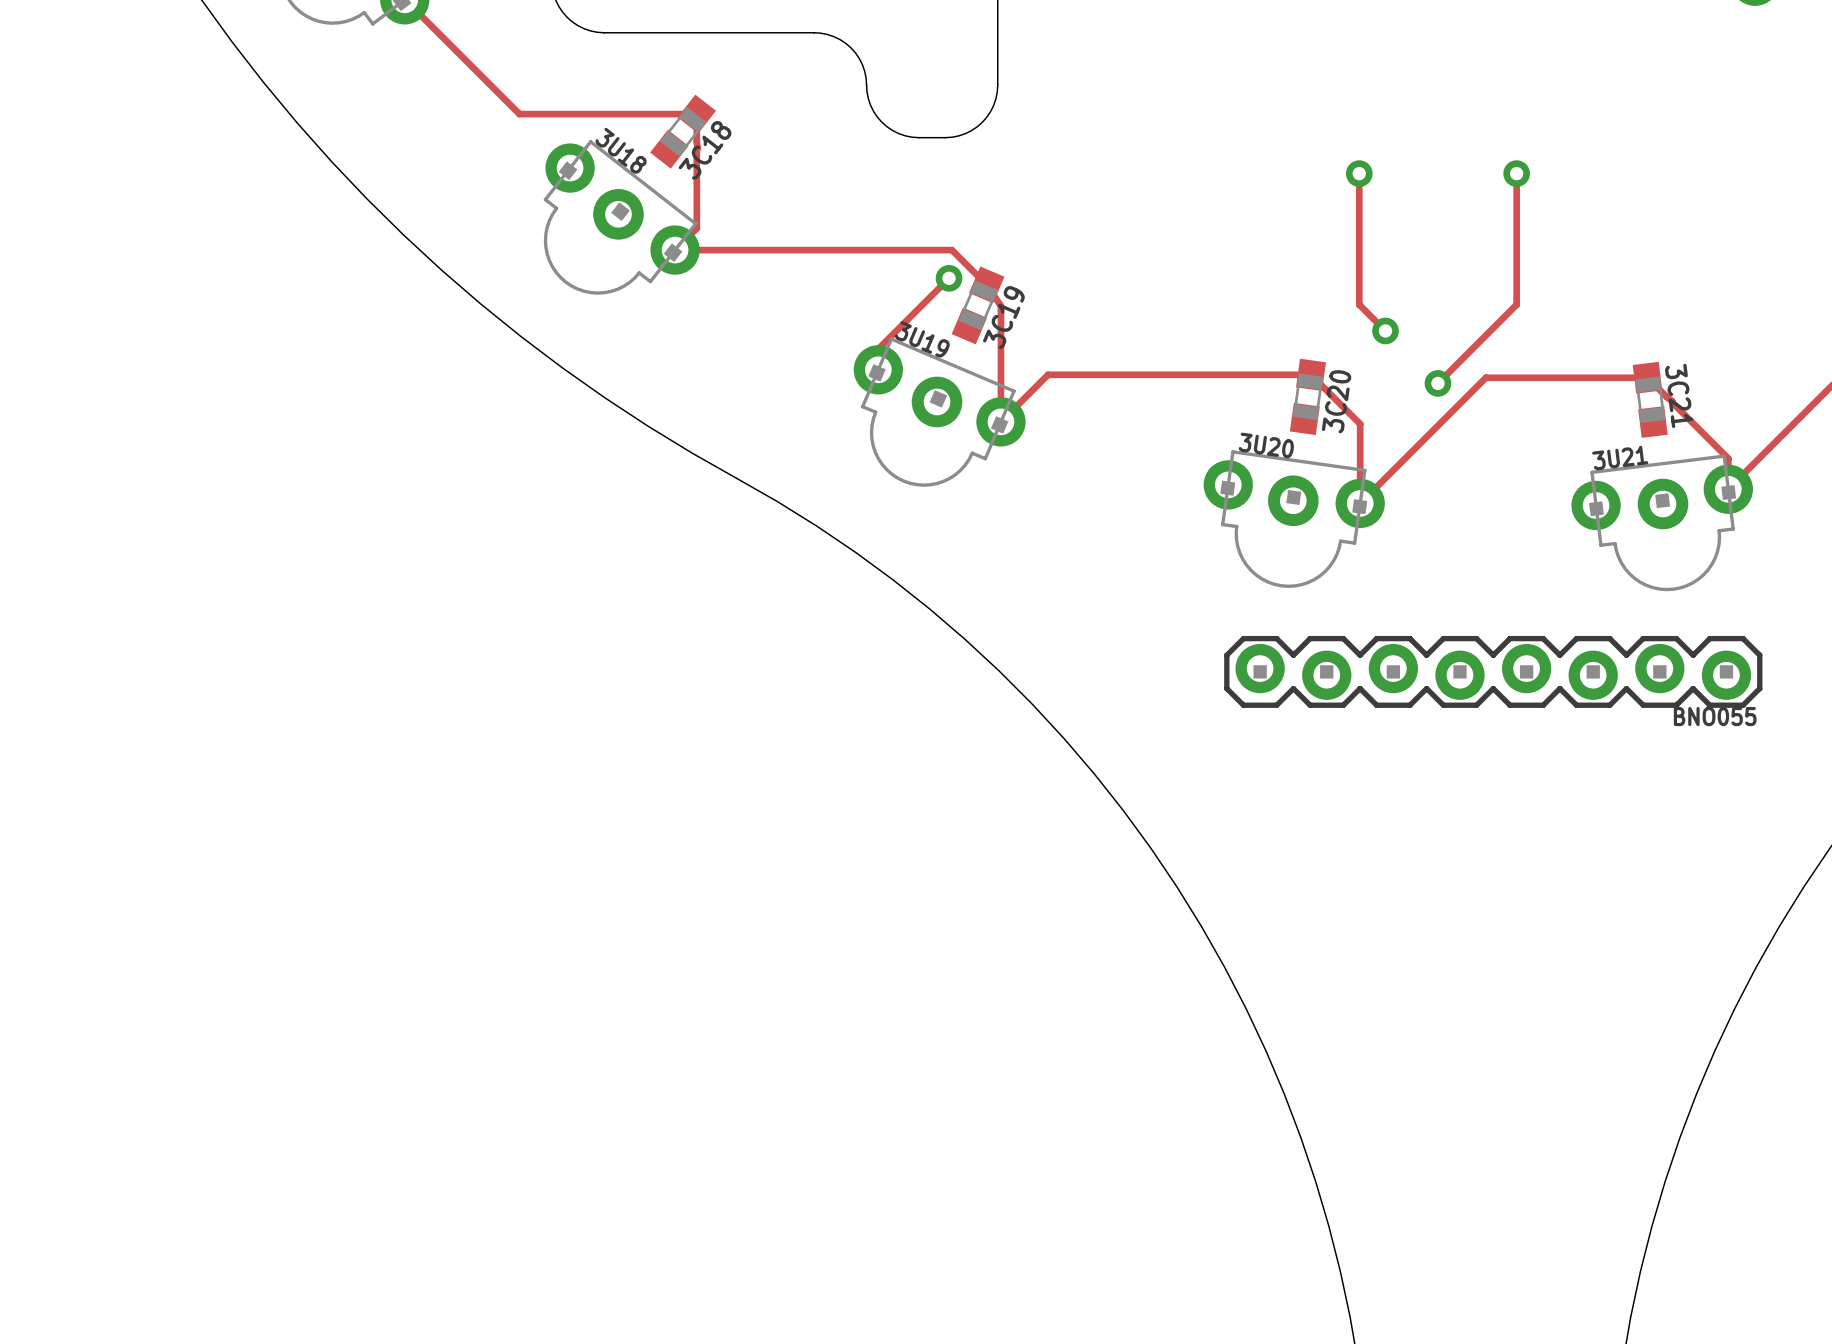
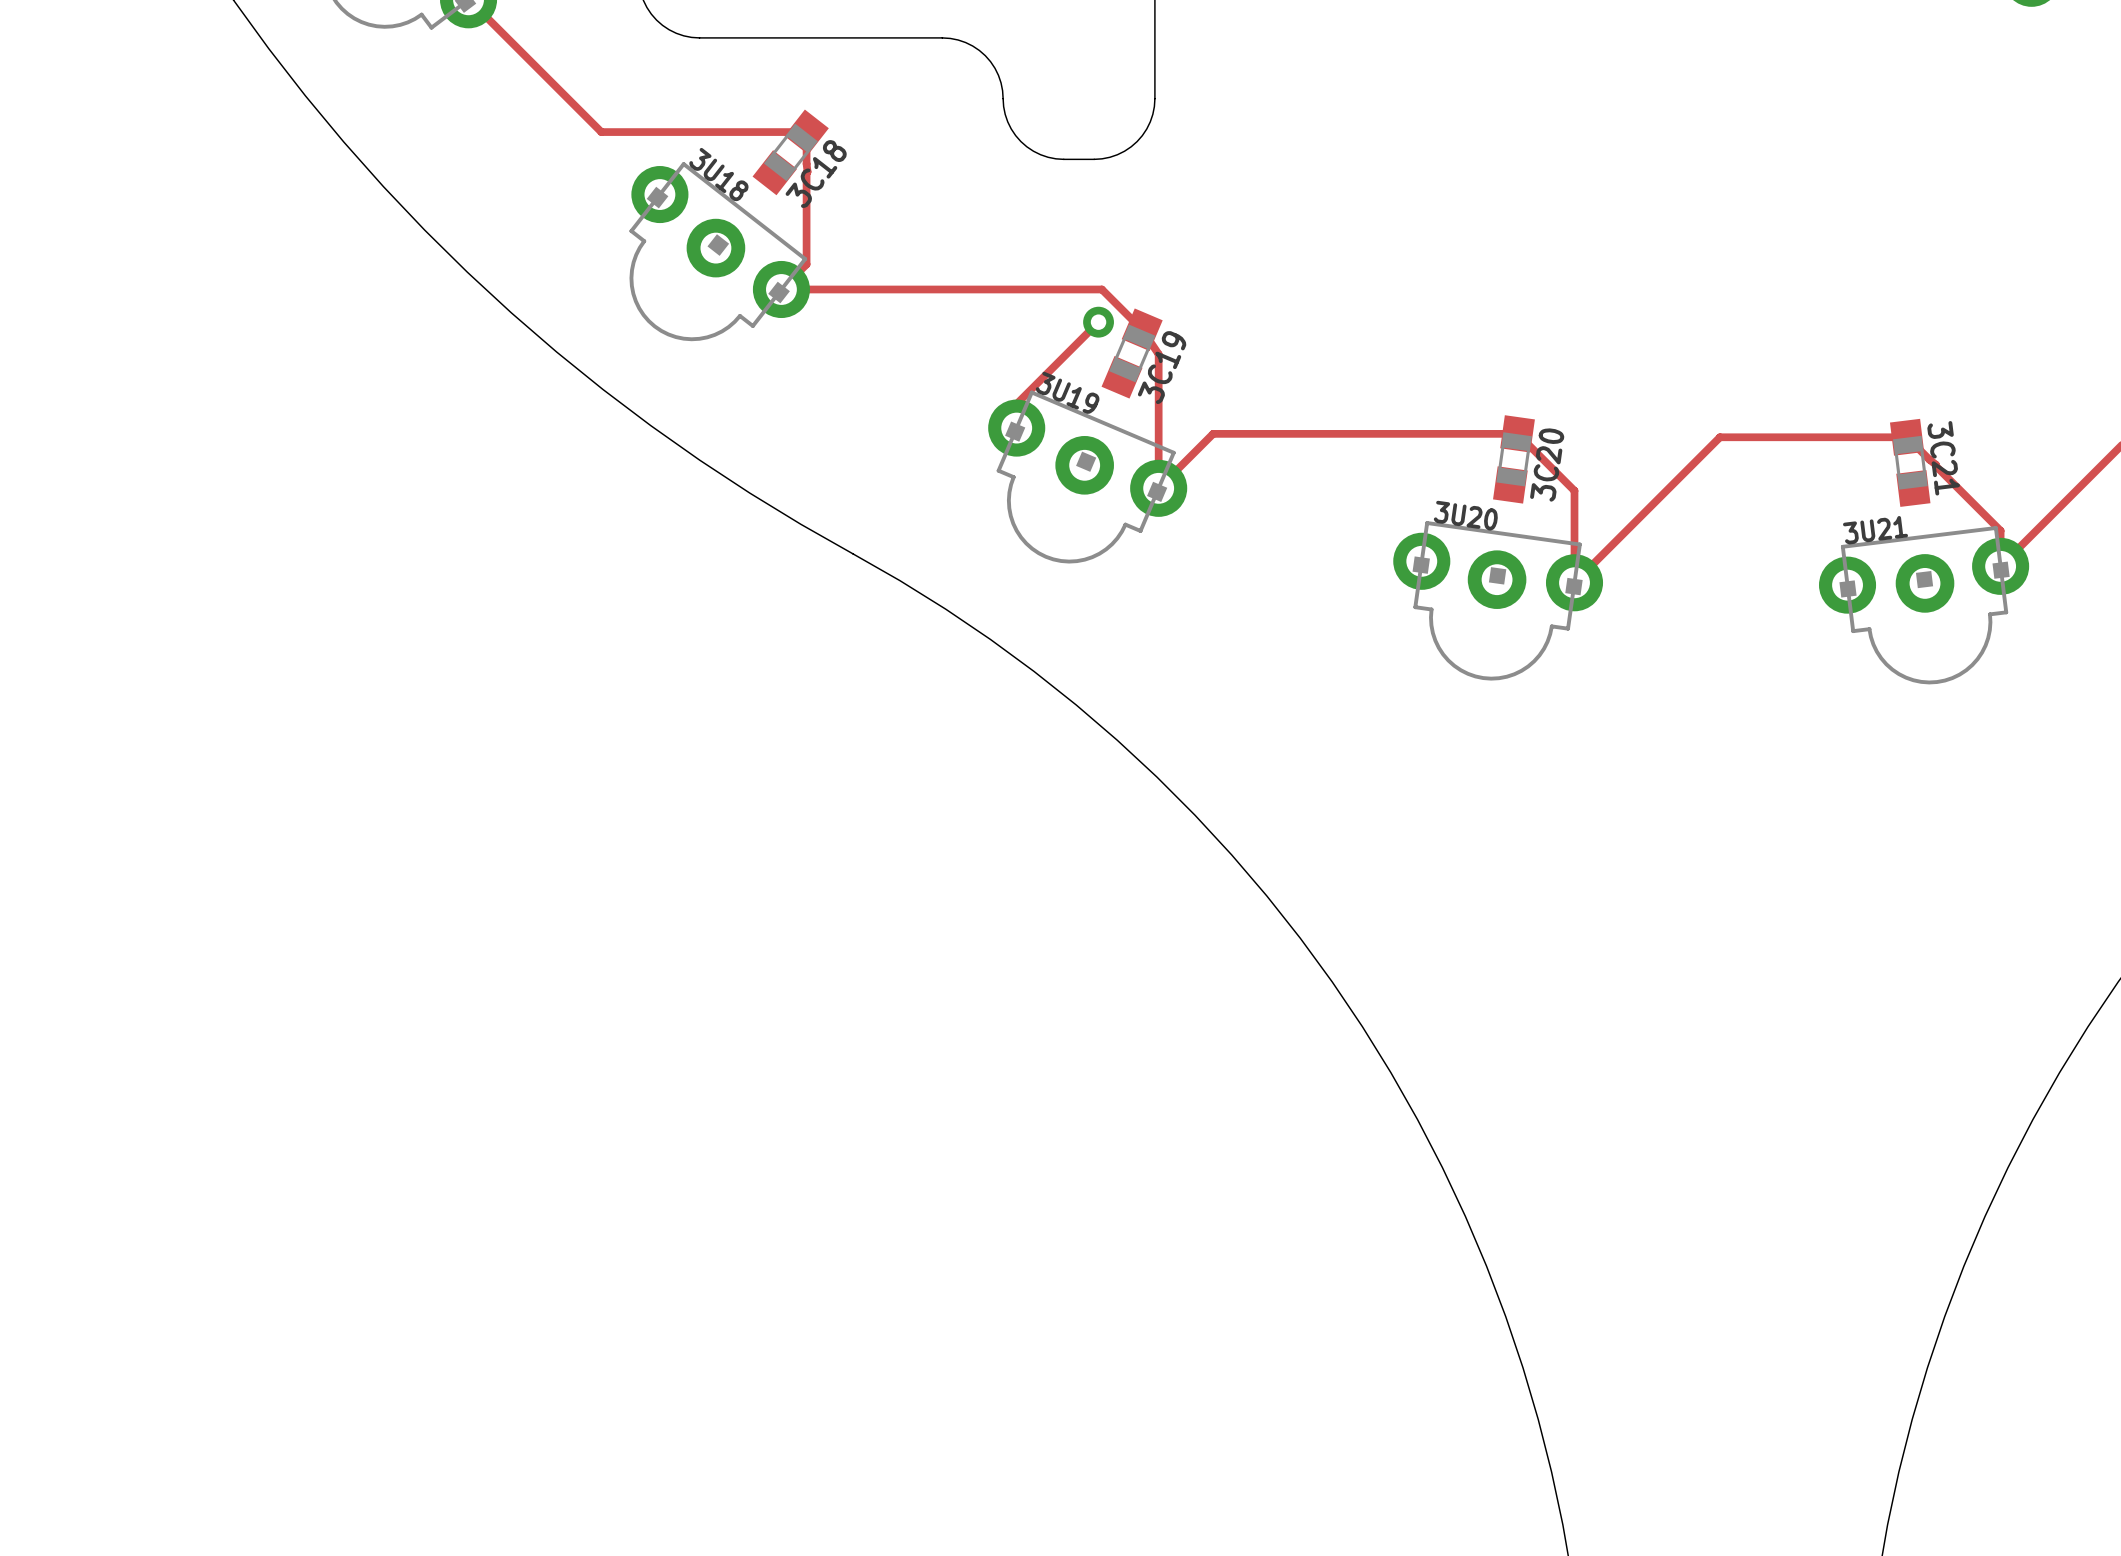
track: (1359, 173) (1359, 304) (1385, 330) -> none
via: (1359, 173) -> none
track: (1516, 173) (1516, 304) (1437, 383) -> none
via: (1516, 173) -> none
via: (1385, 330) -> none
via: (1437, 383) -> none
BNO055: (1493, 671) -> none

